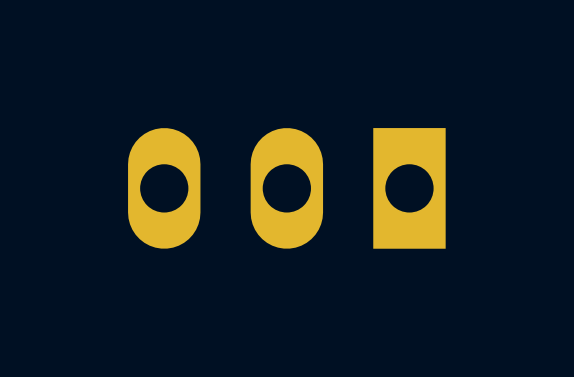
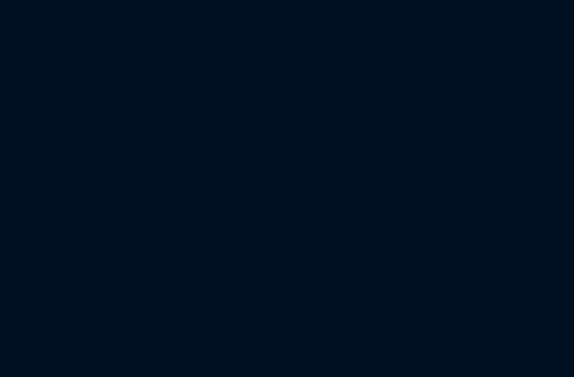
part: (286, 188) -> none

